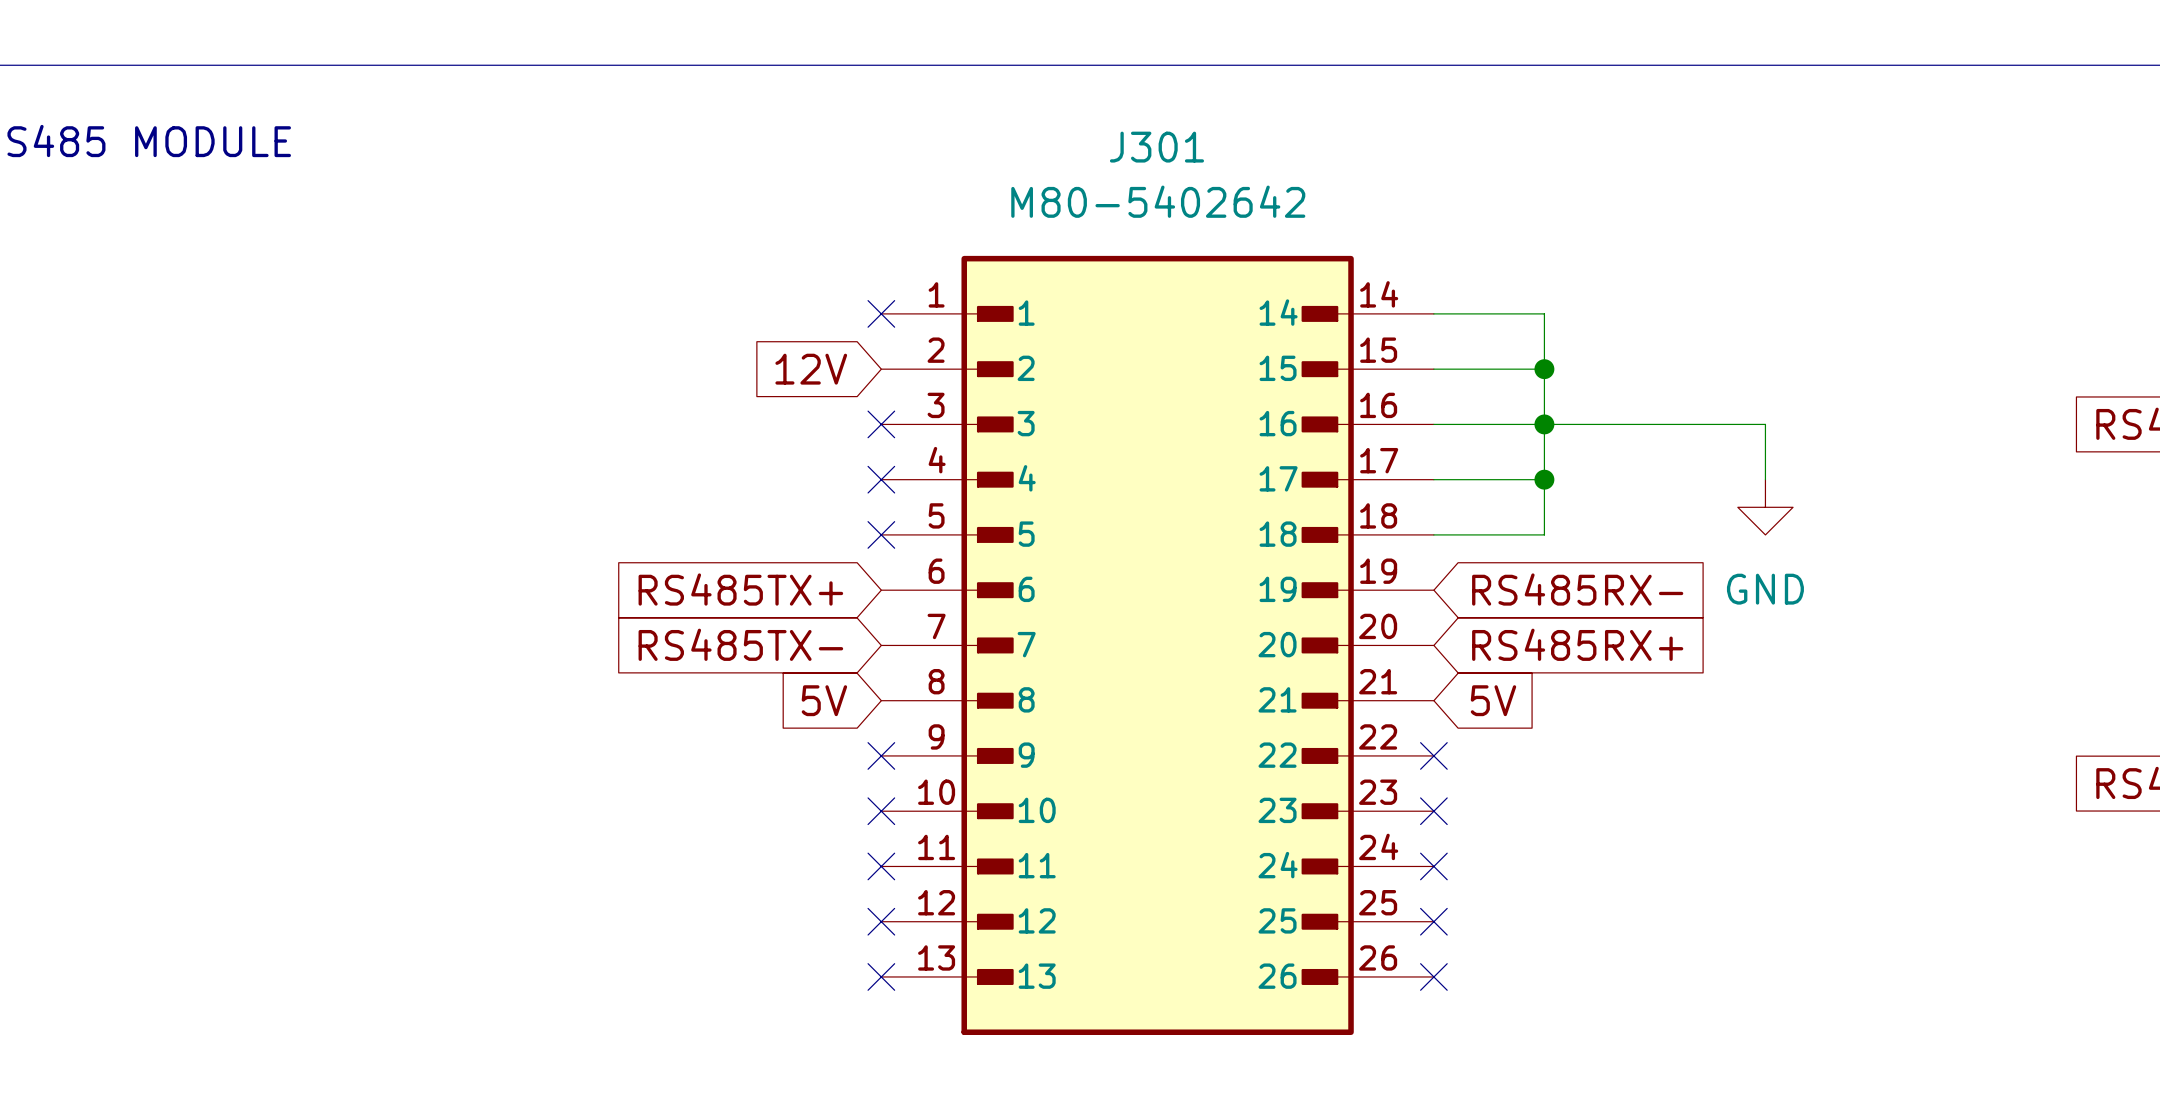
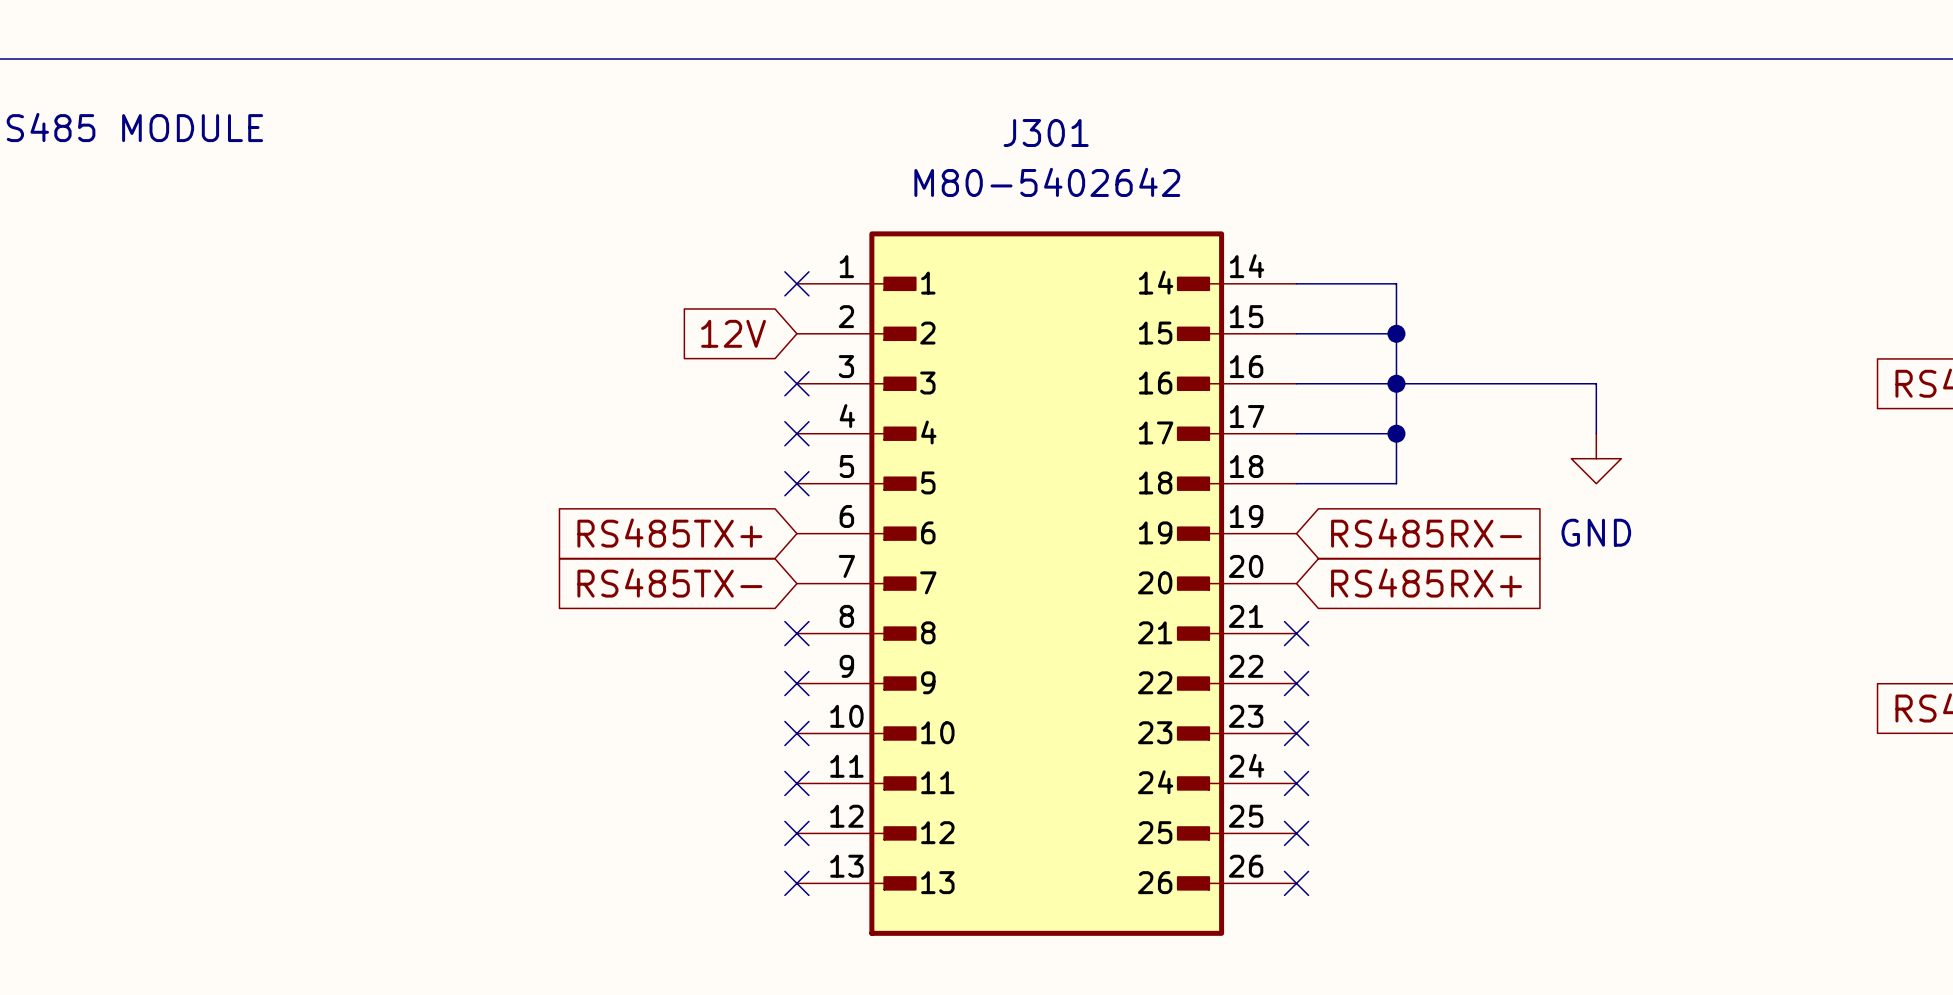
global label: 5V (824, 700) -> none
no-connect mark: none -> (796, 633)
no-connect mark: none -> (1296, 633)
global label: 5V (1493, 700) -> none

